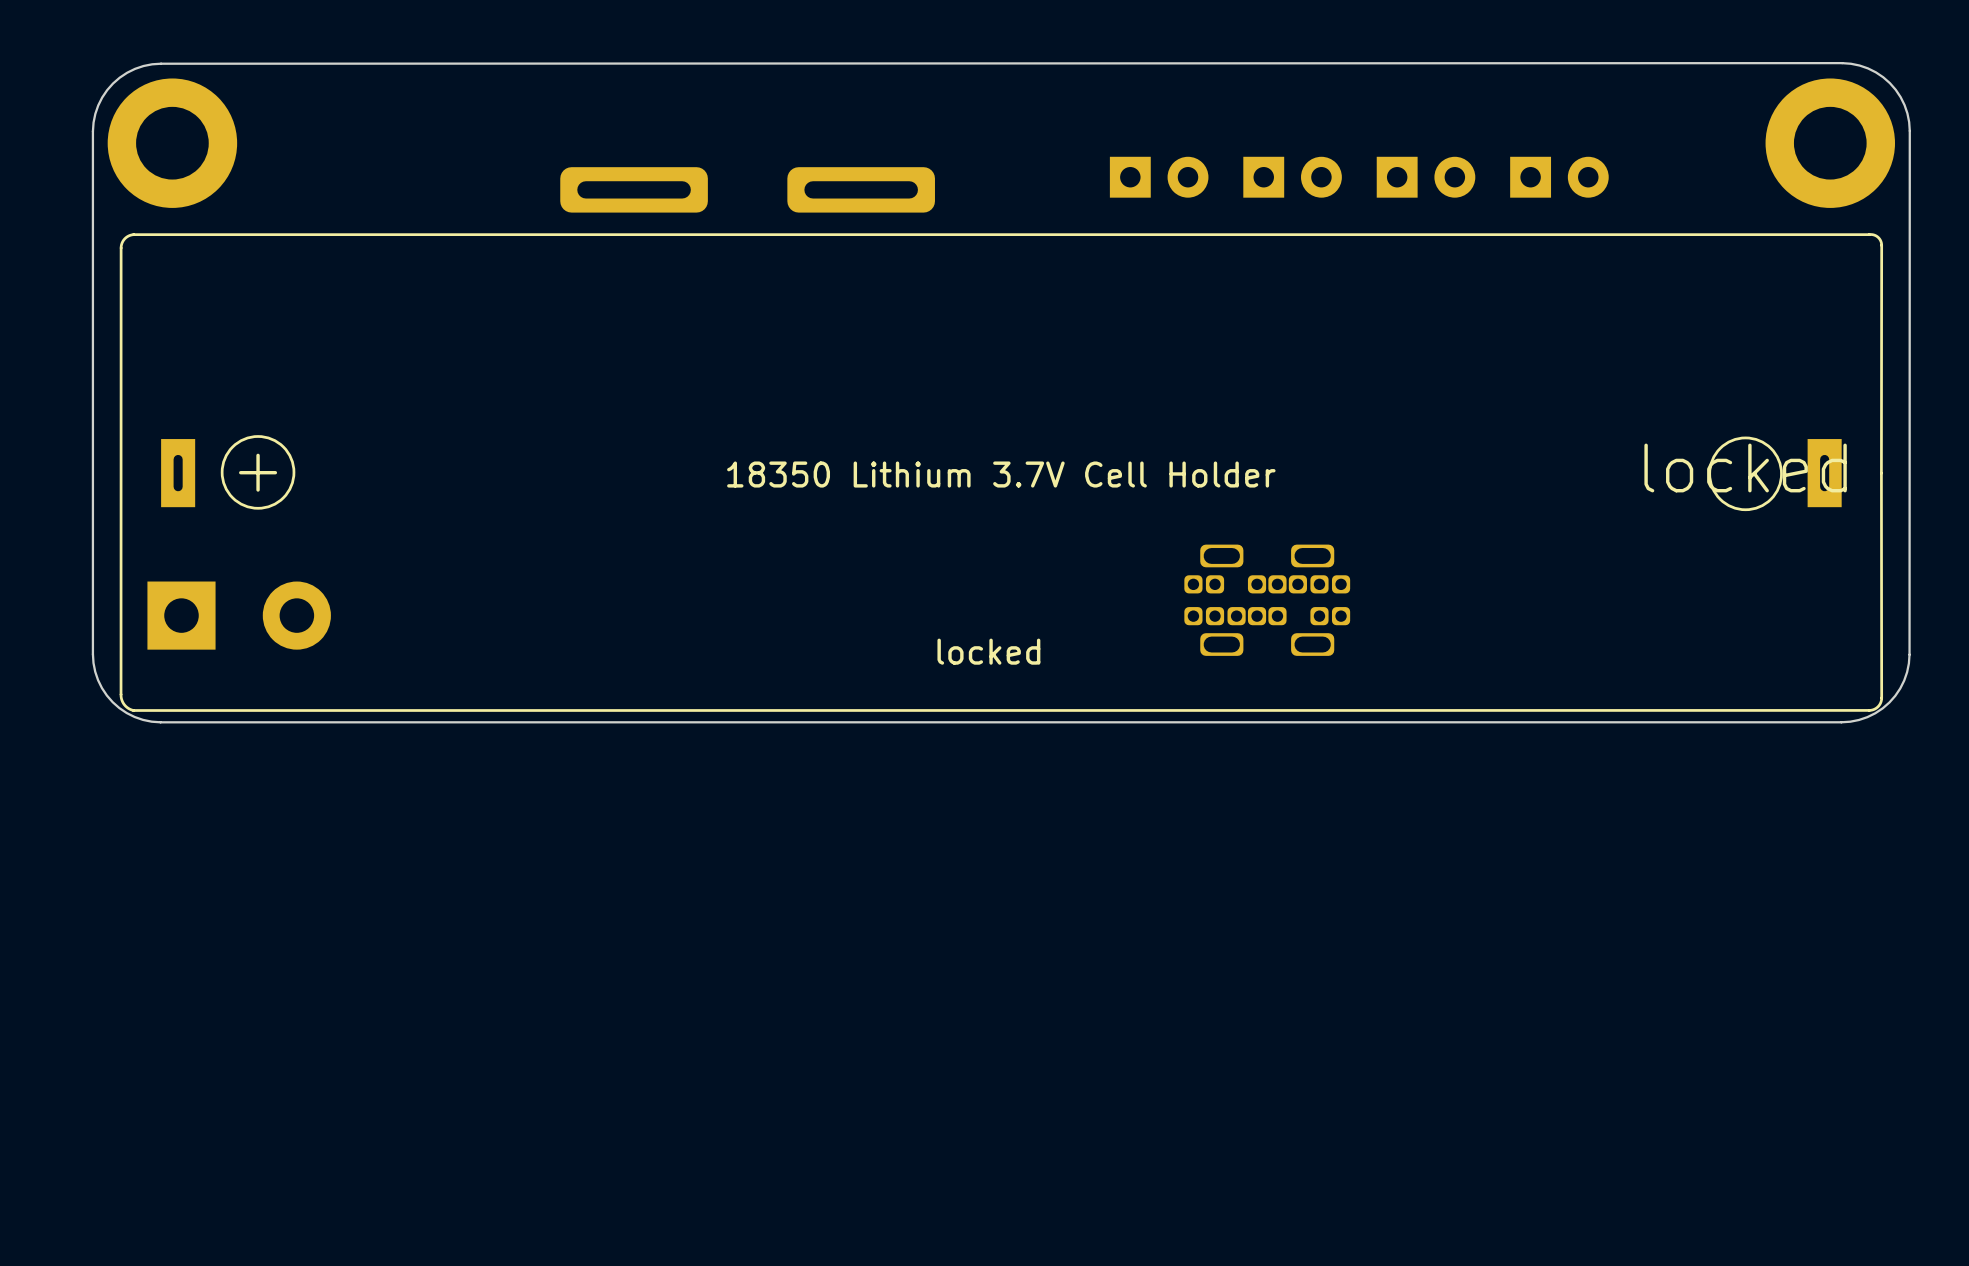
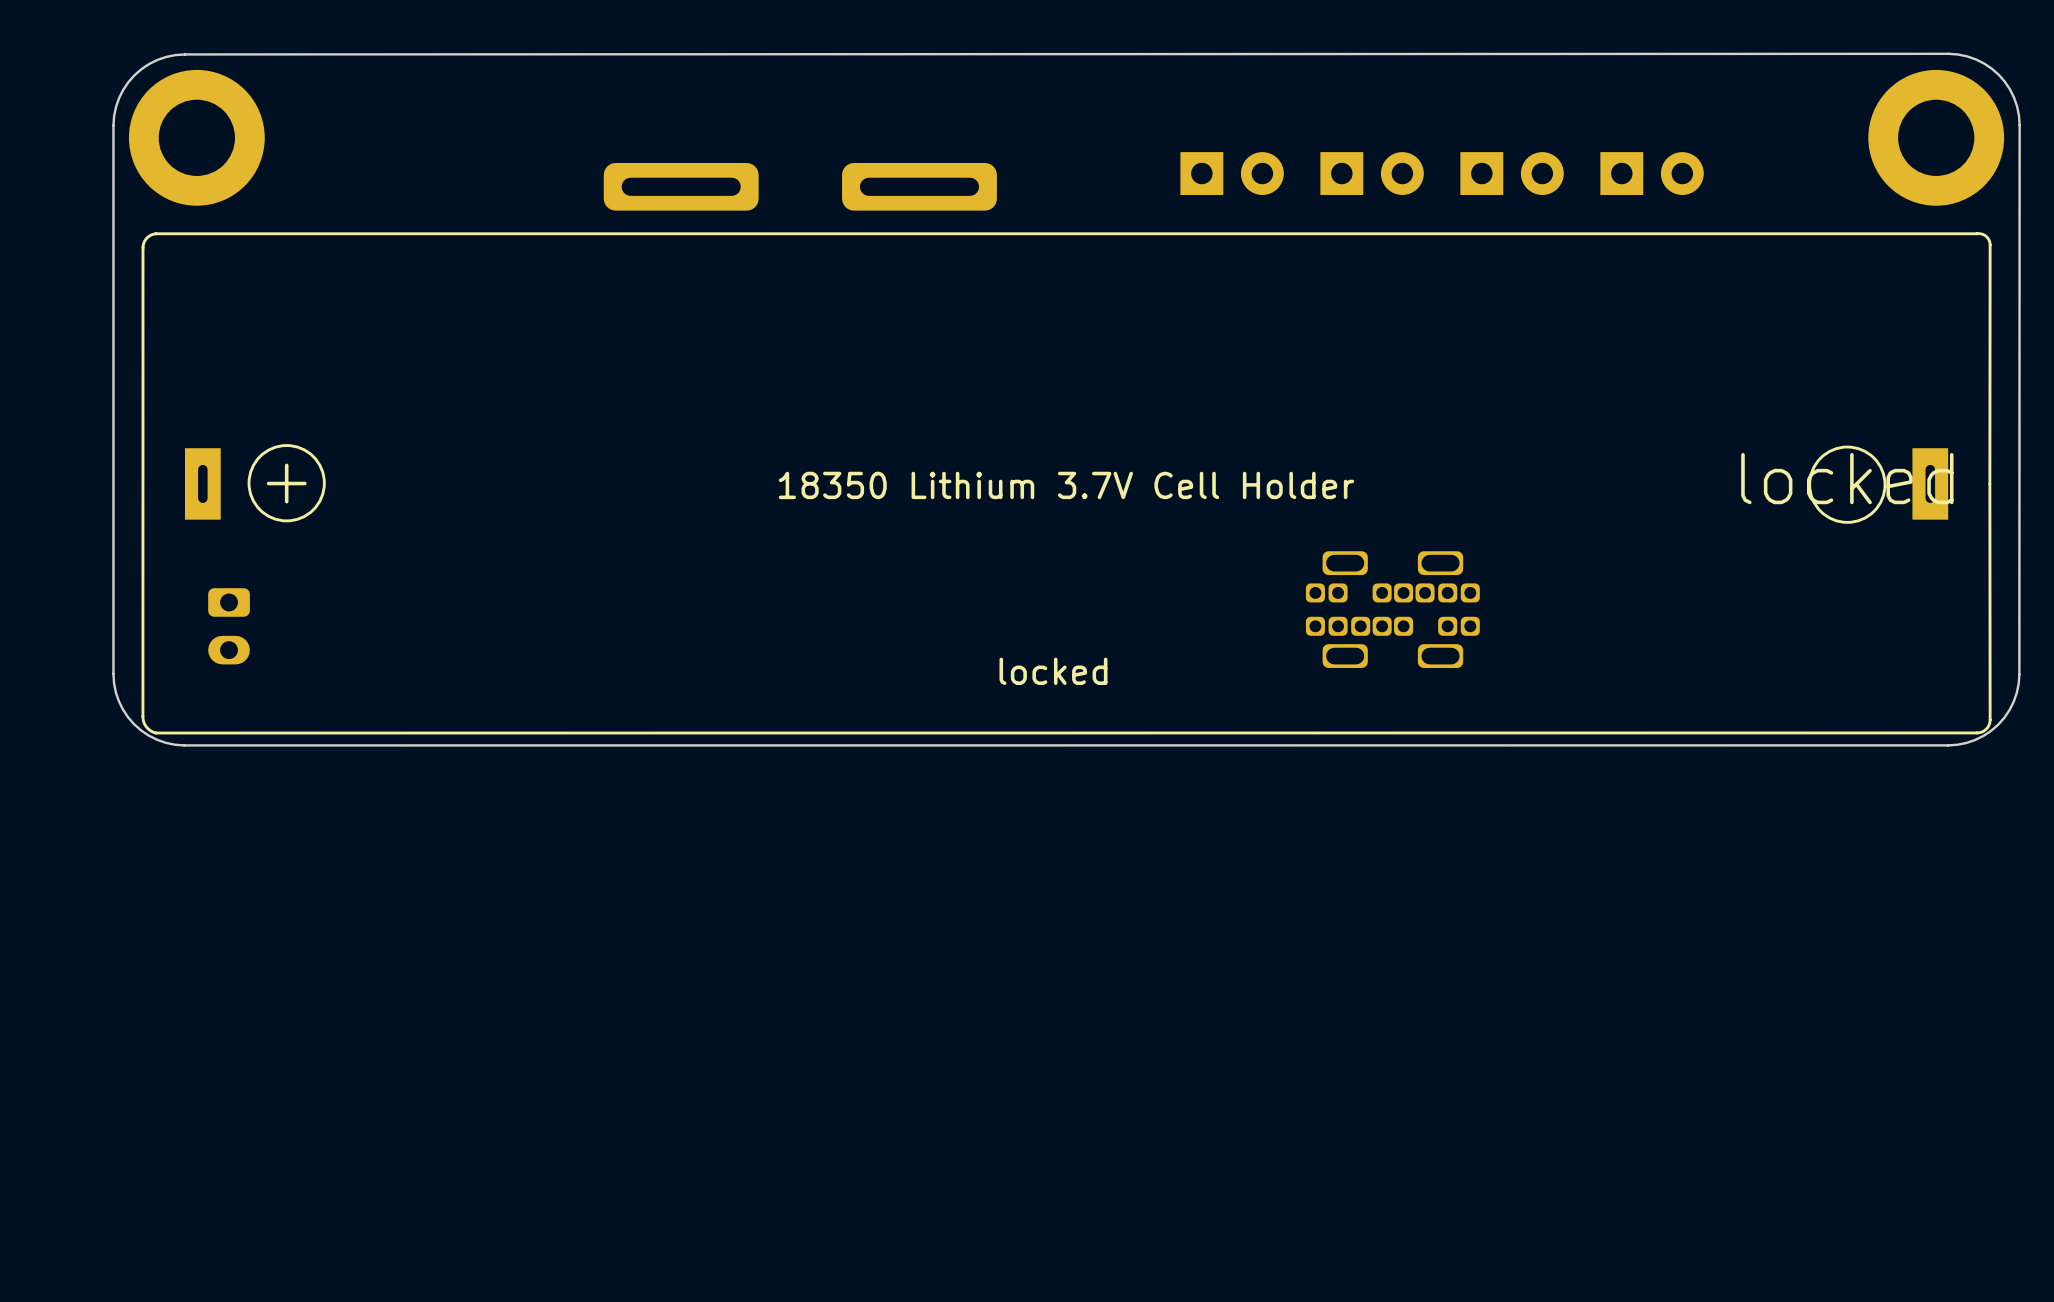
part position: (1267, 600) -> (1392, 609)
part: none -> (229, 626)
part: (239, 615) -> none

